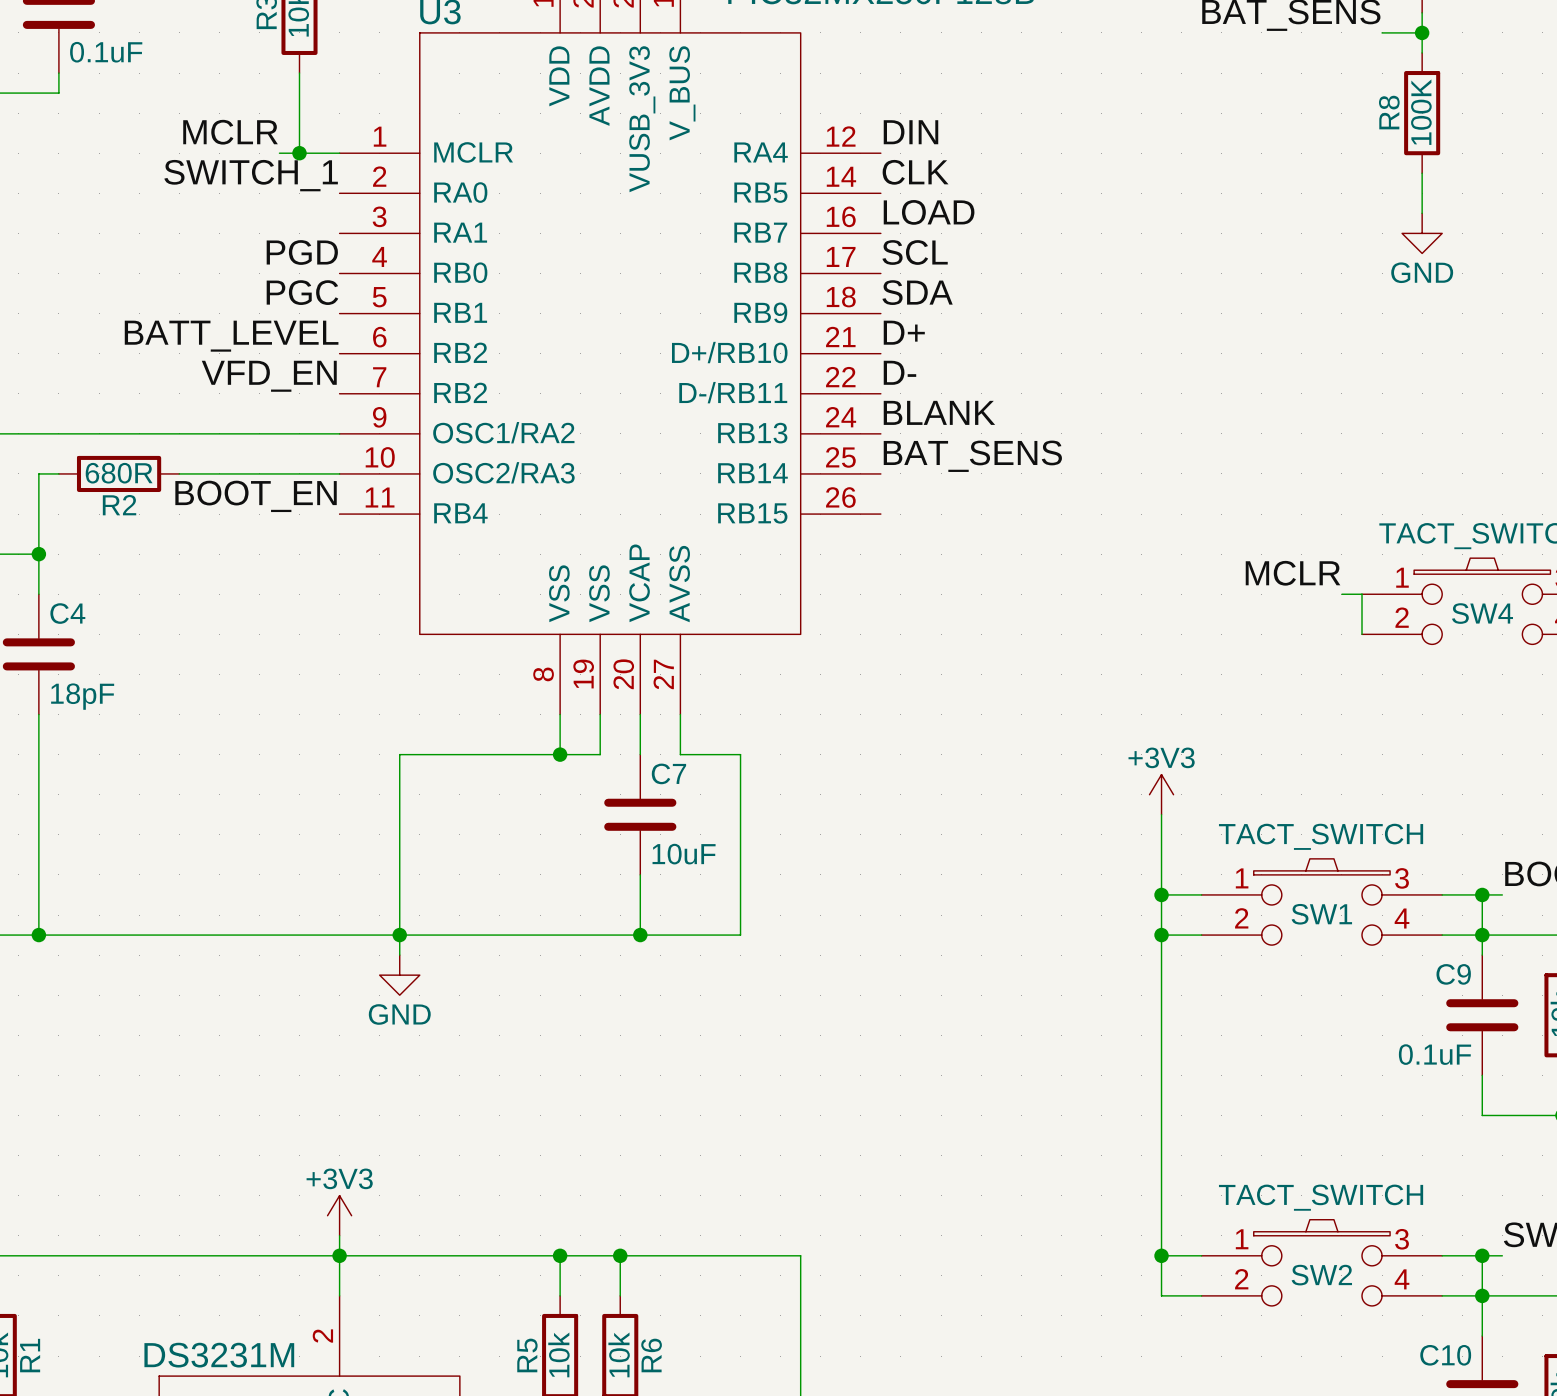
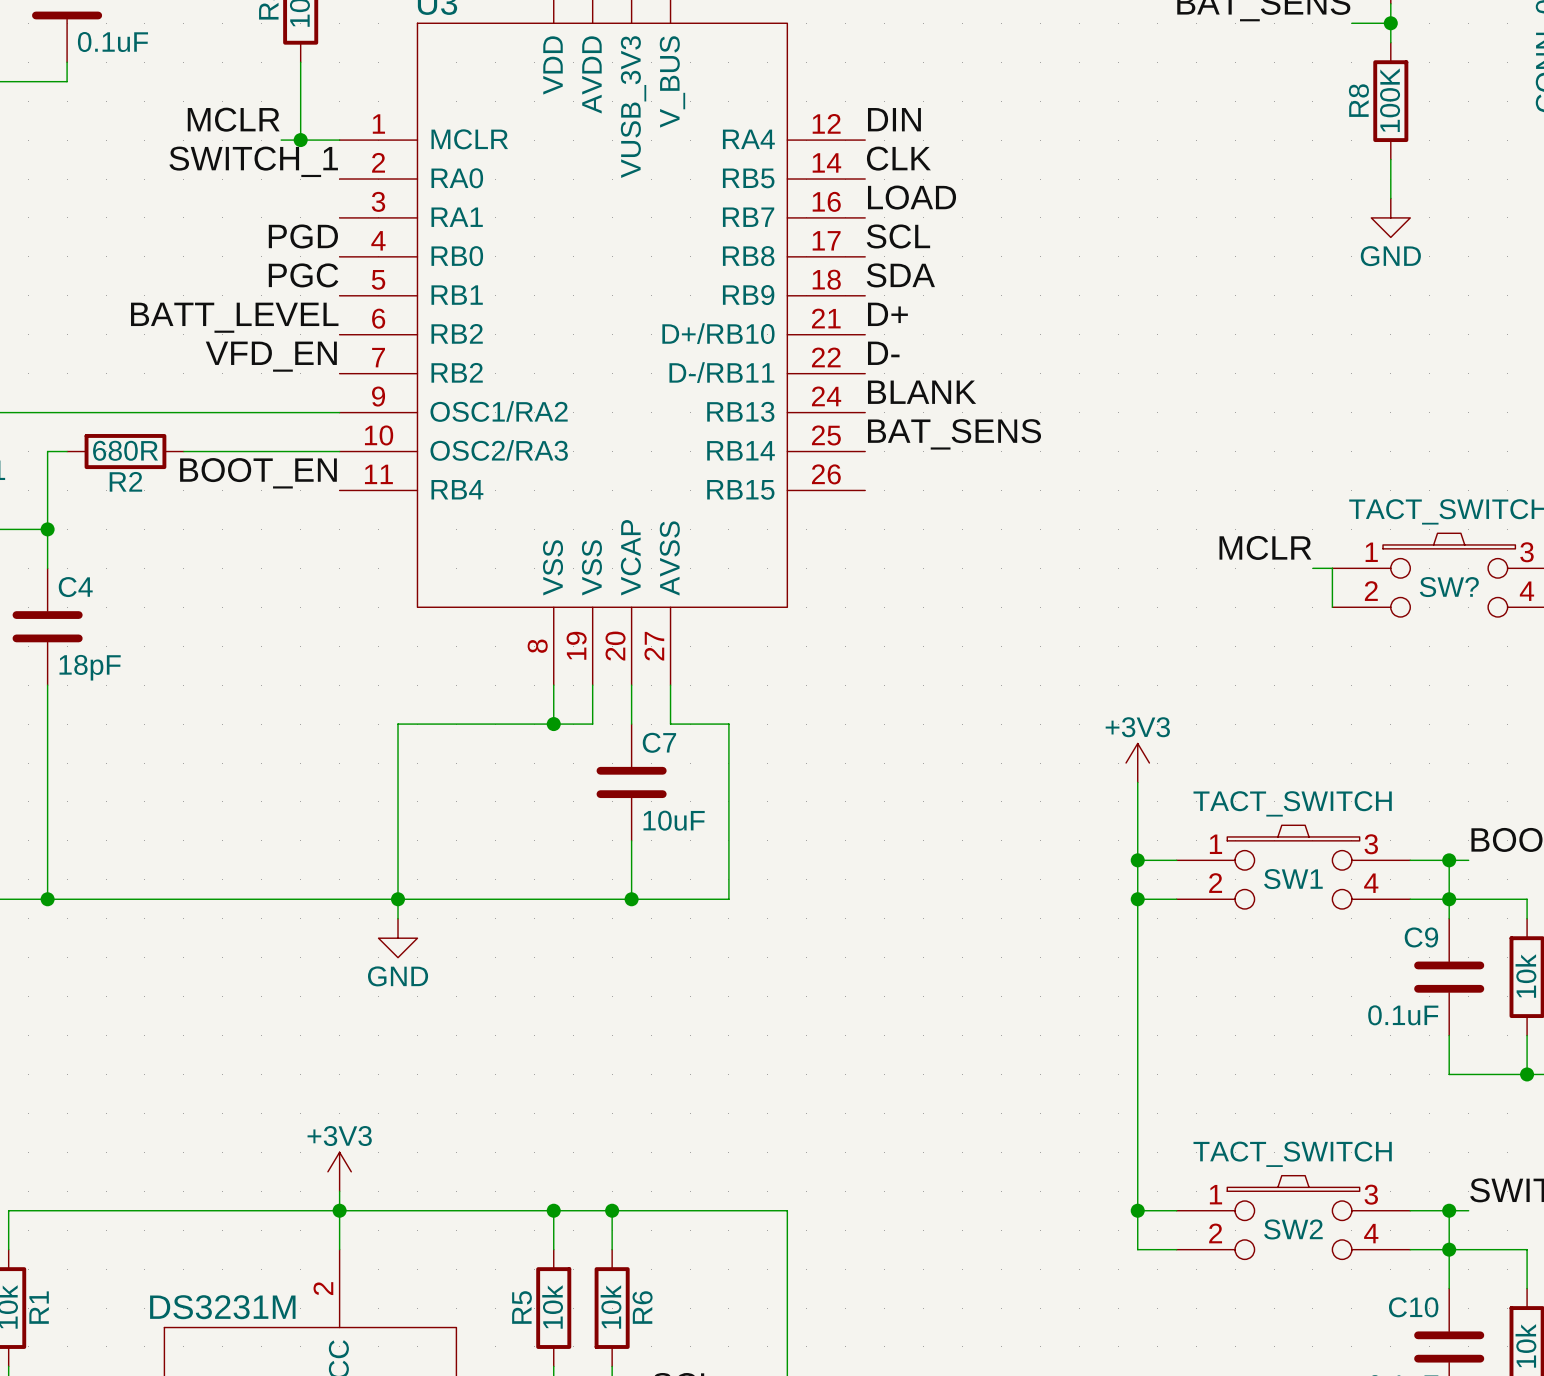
SW4 name: SW4 (1482, 613) -> SW? (1449, 587)

